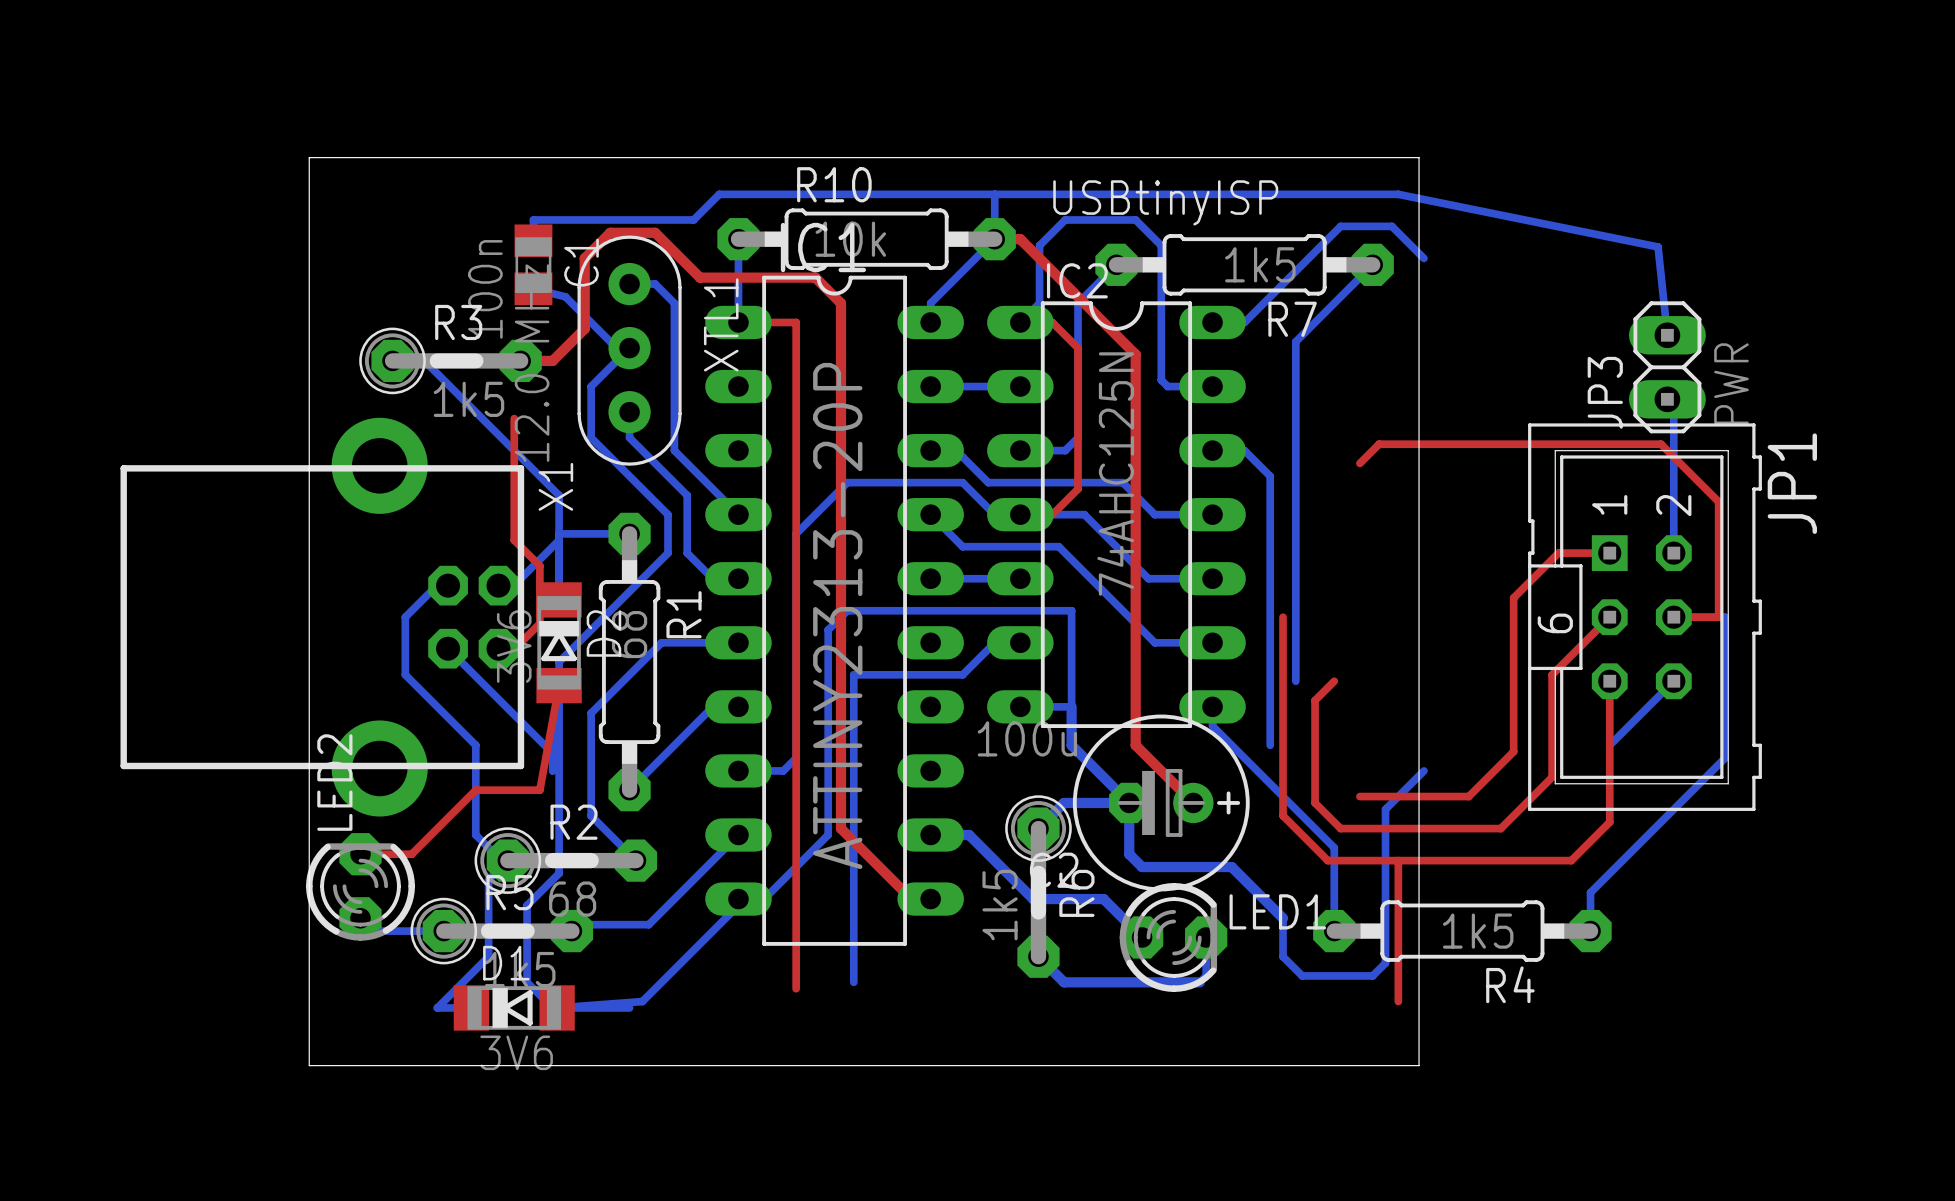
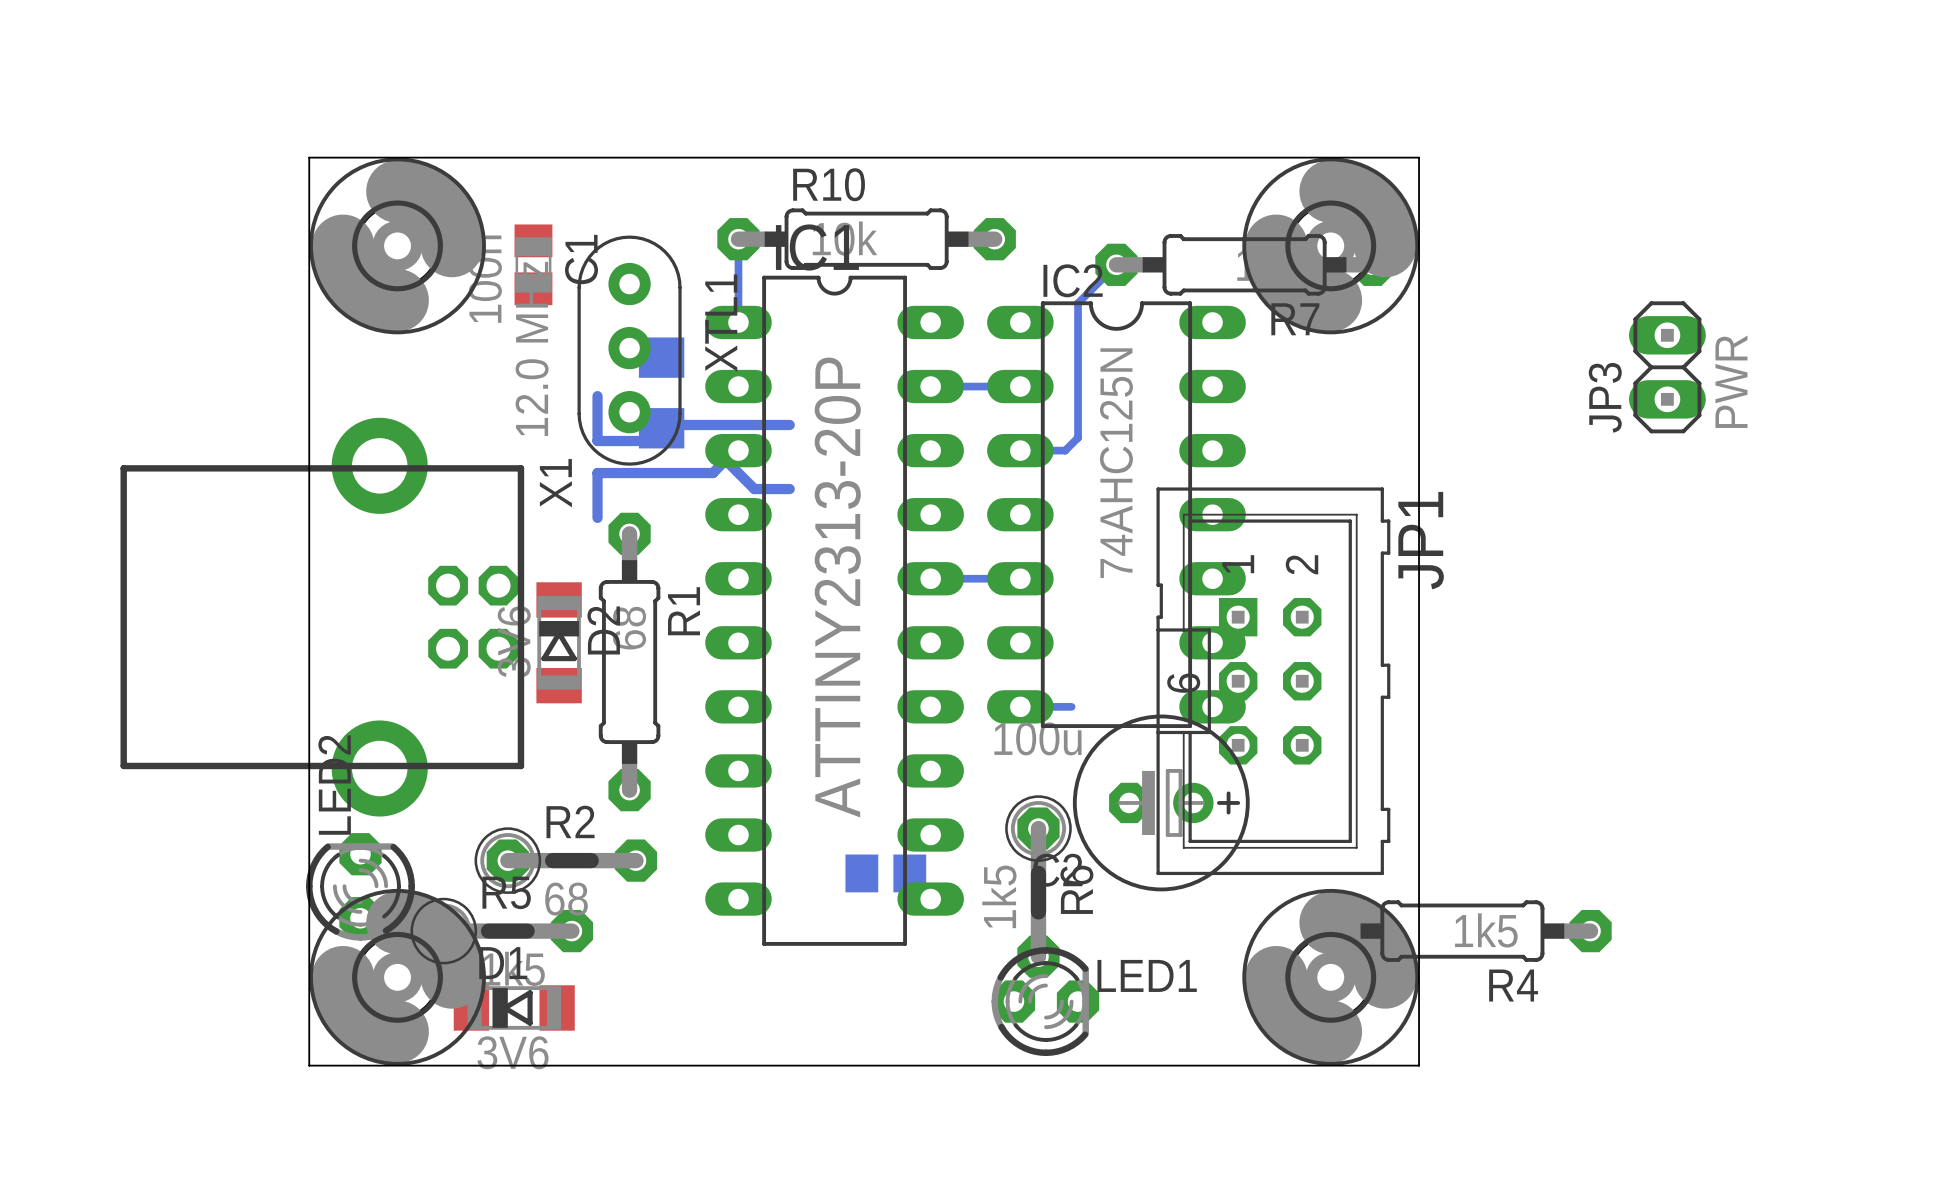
bottom track: (994, 194) (994, 239) (930, 303) (930, 322) -> none
text: USBtinyISP (1165, 202) -> none
top track: (994, 239) (1020, 239) (1135, 354) (1135, 745) (1193, 802) -> none
bottom track: (533, 240) (533, 219) (693, 219) (719, 194) (1398, 194) (1658, 246) (1667, 335) -> none
part: none -> (397, 245)
part: none -> (1330, 245)
bottom track: (1423, 258) (1391, 226) (1340, 226) (1244, 322) (1212, 322) -> none
bottom track: (1372, 264) (1295, 341) (1295, 681) -> none
bottom track: (629, 284) (655, 284) (674, 303) (674, 450) (738, 514) -> none
bottom track: (533, 288) (565, 296) (610, 341) (629, 341) (629, 348) (591, 386) (591, 437) (668, 514) (668, 553) (559, 662) (559, 873) (527, 905) (527, 982) (552, 1007) (629, 1007) -> none
top track: (738, 322) (796, 322) (796, 988) -> none
bottom track: (1020, 322) (1039, 303) (1039, 245) (1065, 219) (1135, 219) (1161, 245) (1161, 380) (1167, 386) (1212, 386) -> none
top track: (1020, 322) (1052, 322) (1078, 348) (1078, 489) (1052, 514) (1007, 514) -> none
bottom track: (392, 360) (424, 360) (559, 495) (559, 599) -> none
R3: 1k5 (450, 360) -> none
top track: (520, 360) (552, 360) (584, 328) (584, 258) (610, 232) (655, 232) (700, 277) (815, 277) (840, 303) (840, 828) (911, 899) (937, 899) -> none
part: none -> (661, 392)
bottom track: none -> (597, 396) (597, 440) (648, 440) (661, 428) (661, 424) (789, 424)
bottom track: (1667, 399) (1673, 399) (1673, 559) -> none
bottom track: (629, 412) (629, 437) (687, 495) (687, 553) (712, 578) (738, 578) -> none
top track: (514, 418) (514, 540) (539, 565) (539, 623) (514, 648) (498, 648) -> none
JP1 footprint: [1528, 423, 1762, 811] -> [1156, 487, 1391, 876]
bottom track: (930, 450) (937, 450) (943, 457) (962, 457) (988, 482) (1122, 482) (1154, 514) (1212, 514) -> none
bottom track: (1212, 450) (1244, 450) (1270, 476) (1270, 745) -> none
top track: (1359, 463) (1379, 444) (1661, 444) (1718, 501) (1718, 617) (1673, 617) -> none
bottom track: none -> (789, 489) (754, 489) (725, 460) (712, 473) (597, 473) (597, 517)
bottom track: (930, 514) (962, 546) (1058, 546) (1154, 642) (1218, 642) -> none
bottom track: (559, 533) (629, 533) -> none
bottom track: (559, 540) (513, 585) (498, 585) -> none
top track: (1609, 553) (1558, 553) (1513, 597) (1513, 751) (1468, 796) (1359, 796) -> none
bottom track: (1212, 578) (1148, 578) (1084, 514) (994, 514) (962, 482) (847, 482) (796, 533) (796, 758) (783, 770) (738, 770) -> none
bottom track: (448, 585) (436, 585) (405, 617) (405, 674) (475, 745) (475, 834) (501, 860) (507, 860) (488, 879) (488, 956) (437, 1007) (471, 1007) -> none
top track: (1283, 617) (1283, 815) (1327, 860) (1571, 860) (1609, 822) (1609, 681) -> none
top track: (1609, 617) (1552, 674) (1552, 777) (1500, 828) (1340, 828) (1315, 802) (1315, 700) (1334, 681) -> none
bottom track: (1673, 617) (1725, 617) (1725, 758) (1590, 892) (1590, 931) -> none
bottom track: (738, 642) (661, 642) (591, 713) (591, 815) (635, 860) -> none
bottom track: (1020, 642) (994, 642) (962, 674) (853, 674) (853, 982) -> none
bottom track: (448, 648) (552, 753) (552, 770) (559, 685) -> none
bottom track: (1673, 681) (1609, 745) -> none
top track: (559, 685) (539, 790) (475, 790) (411, 854) (360, 854) -> none
bottom track: (738, 706) (712, 706) (629, 790) -> none
bottom track: (1212, 706) (1212, 726) (1334, 847) (1334, 931) -> none
bottom track: (1423, 770) (1385, 809) (1385, 963) (1372, 975) (1302, 975) (1283, 956) (1283, 918) (1231, 867) (1142, 867) (1129, 854) (1129, 802) -> none
bottom track: (1129, 802) (1064, 802) (1038, 828) -> none
bottom track: (1129, 802) (1071, 745) (1071, 610) (847, 610) (828, 629) (828, 834) (764, 899) (738, 899) (738, 905) (642, 1001) (557, 1007) -> none
bottom track: (738, 834) (648, 924) (578, 924) (571, 931) -> none
bottom track: (930, 834) (969, 834) (1033, 899) (1103, 899) (1142, 937) -> none
top track: (1398, 860) (1398, 1001) -> none
part: none -> (885, 873)
LED1 position: (1173, 937) -> (1045, 1001)
bottom track: (1206, 937) (1206, 975) (1199, 982) (1064, 982) (1038, 956) -> none
part: none -> (397, 977)
part: none -> (1330, 977)

